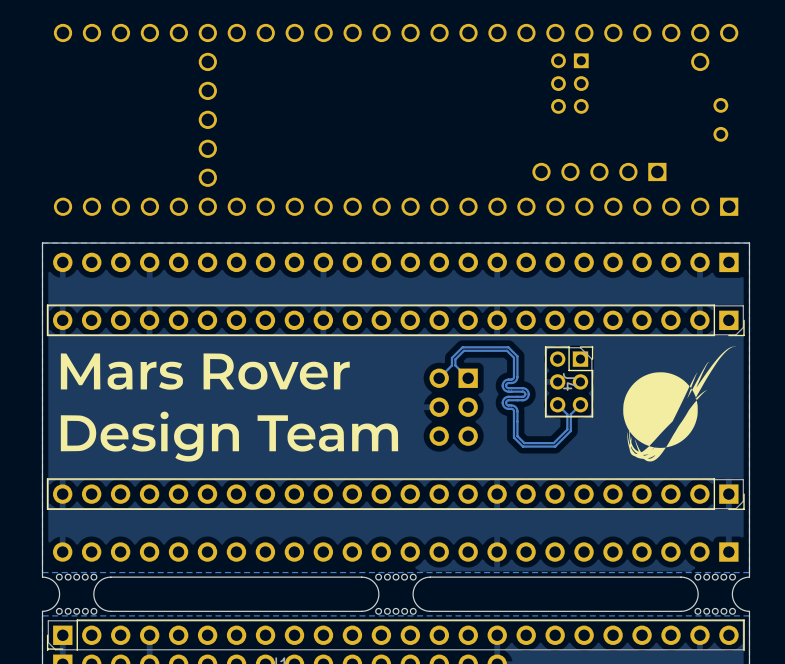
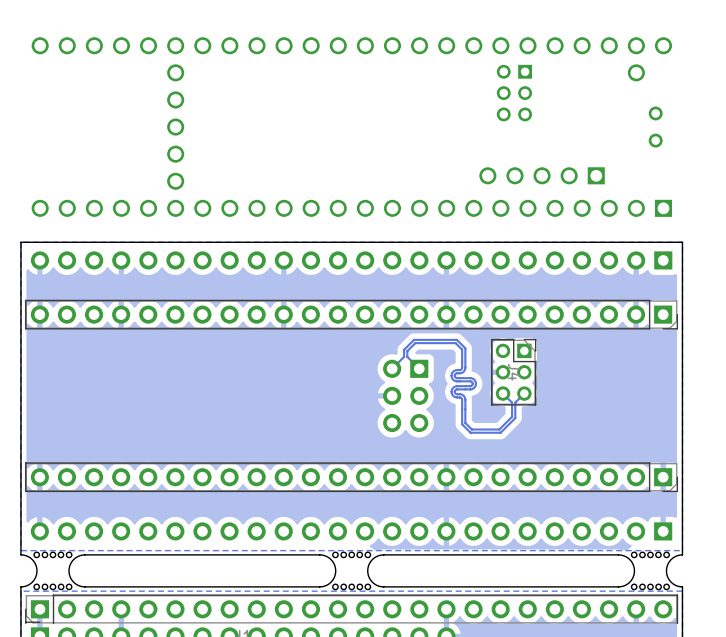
drawing: [623, 346, 737, 462] -> none
drawing: [60, 353, 399, 462] -> none

